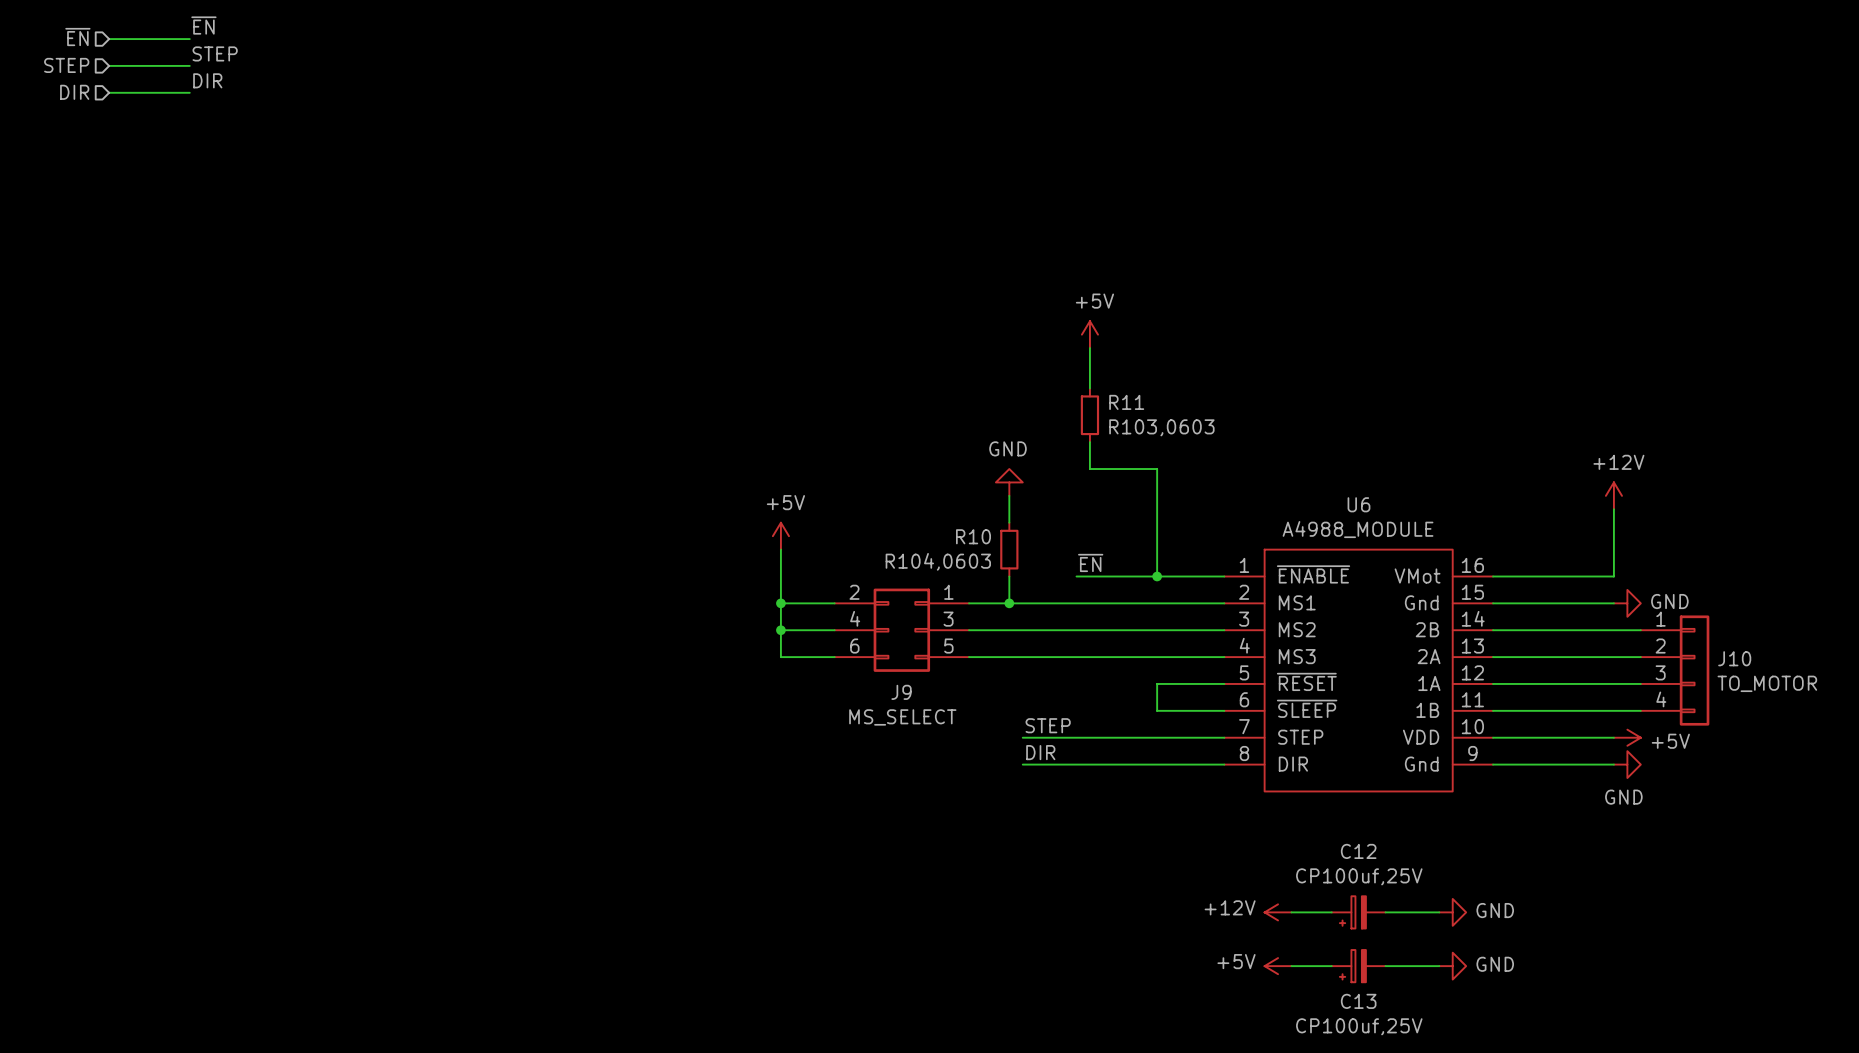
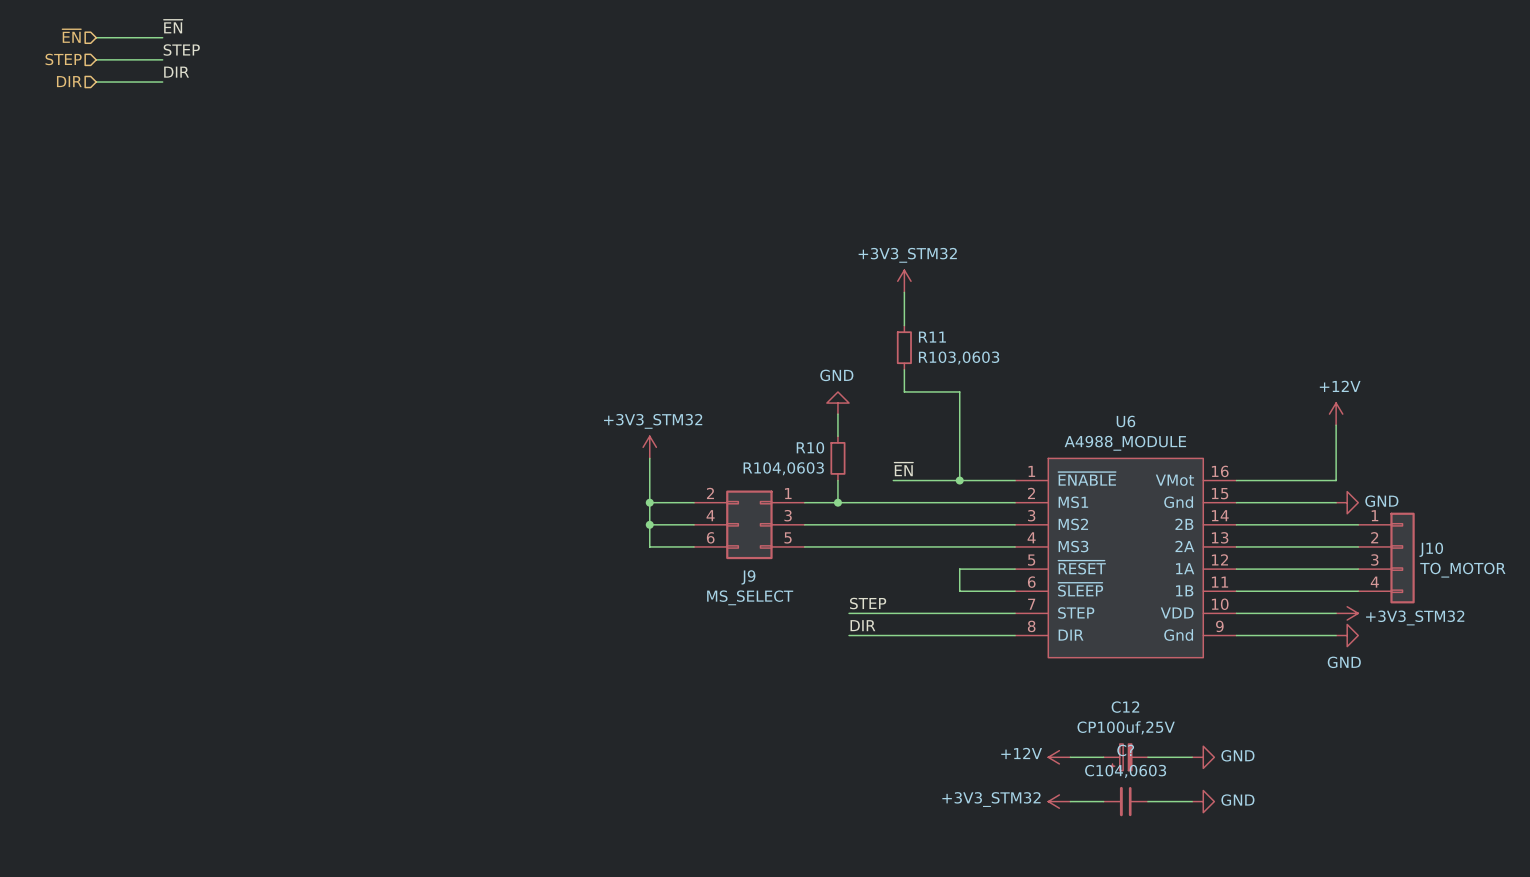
power symbol: +5V (1089, 334) -> +3V3_STM32 (904, 281)
power symbol: +5V (780, 536) -> +3V3_STM32 (649, 447)
power symbol: +5V (1627, 737) -> +3V3_STM32 (1347, 613)
power symbol: +5V (1278, 966) -> +3V3_STM32 (1059, 801)
C13: CP100uf,25V (1358, 966) -> none
C?: none -> C104,0603 (1125, 801)

